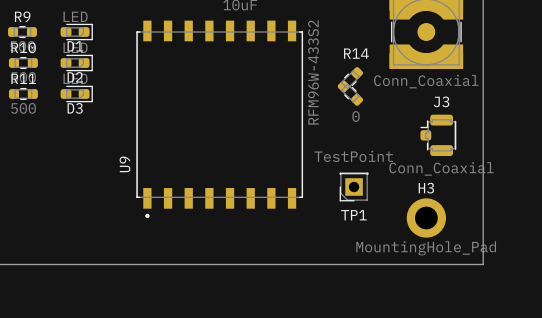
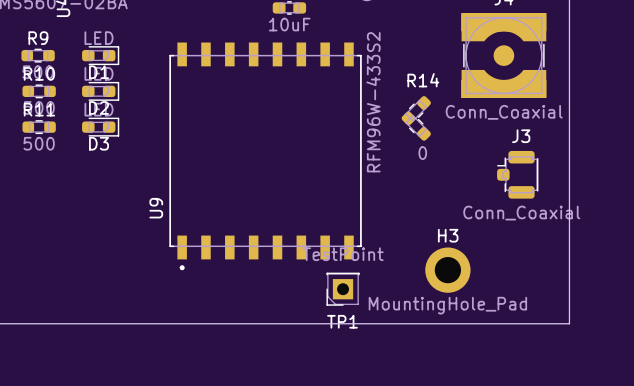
TP1 position: (354, 186) -> (343, 289)
H3 position: (426, 217) -> (447, 270)

